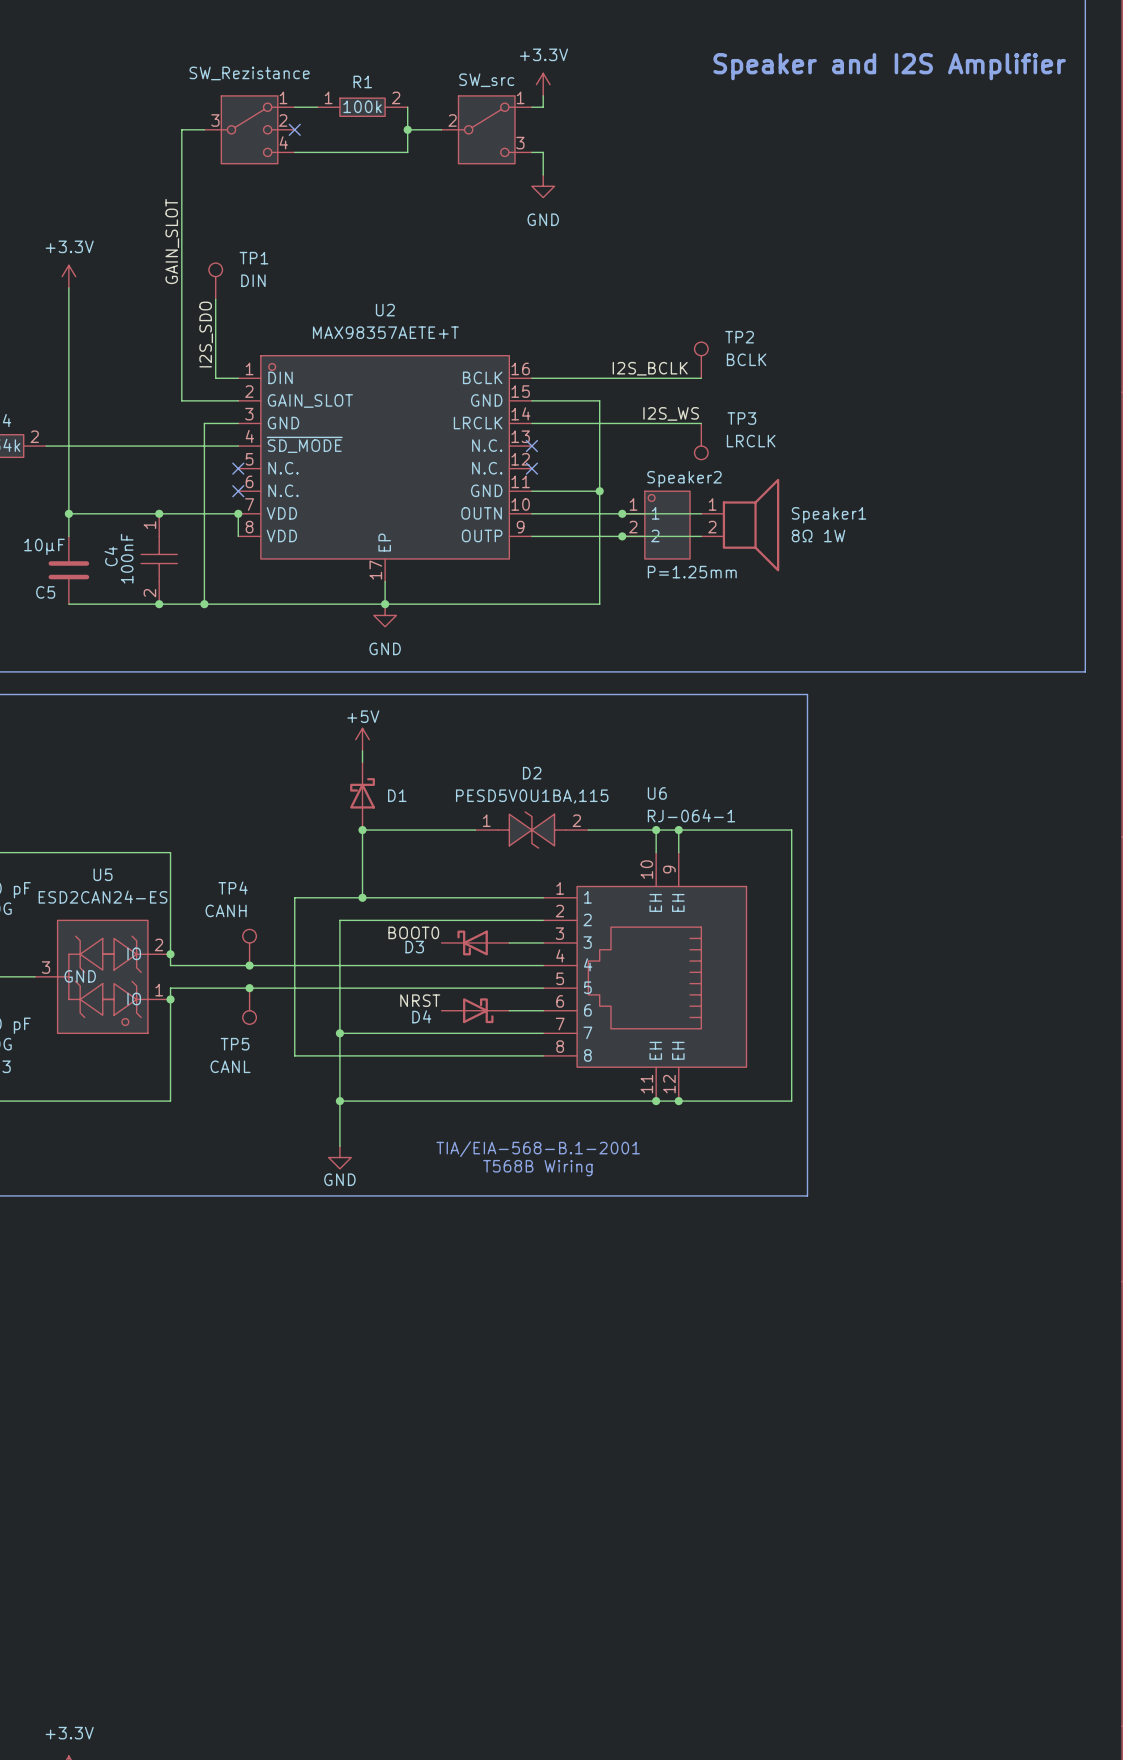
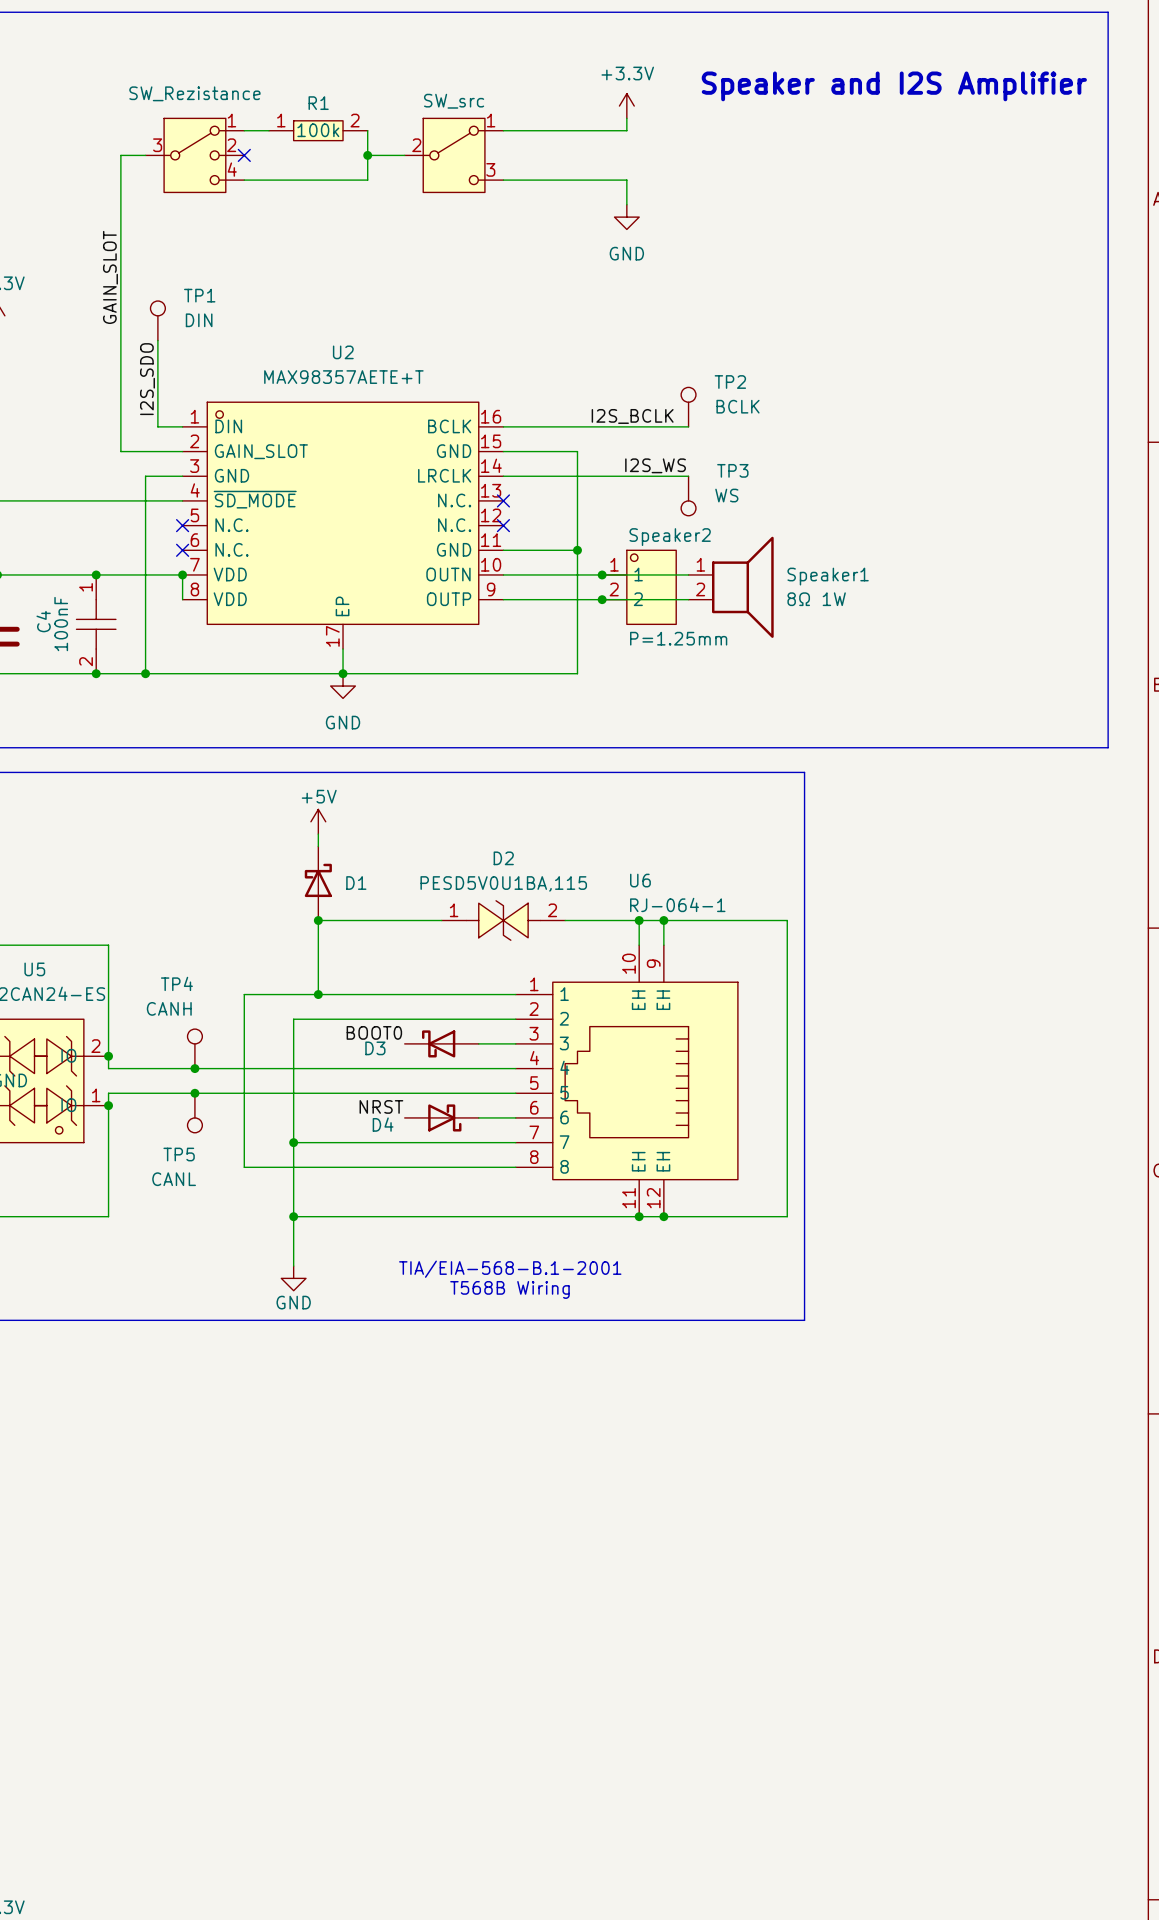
power symbol position: +3.3V (543, 84) -> +3.3V (626, 106)
wire: (543, 95) (543, 107) -> (626, 118) (626, 130) (515, 130)
wire: (543, 152) (543, 174) -> (515, 180) (626, 180) (626, 204)
power symbol position: GND (543, 186) -> GND (626, 217)
TP3 value: LRCLK (751, 441) -> WS (726, 495)

